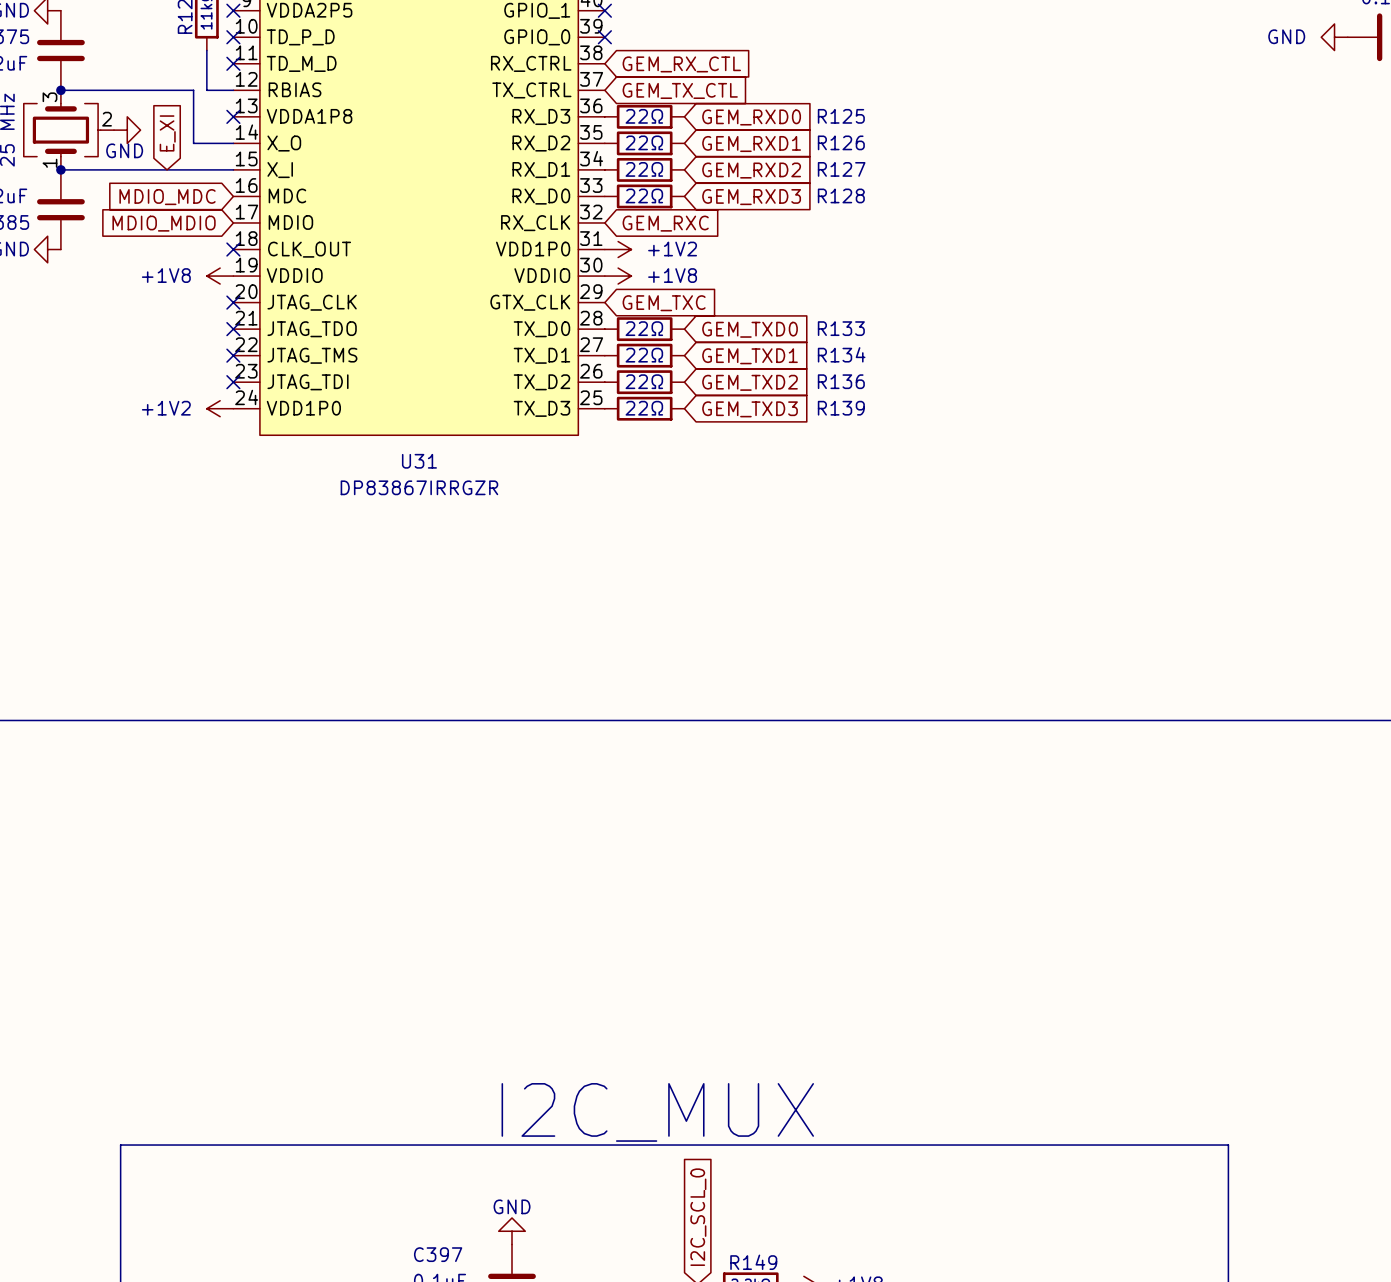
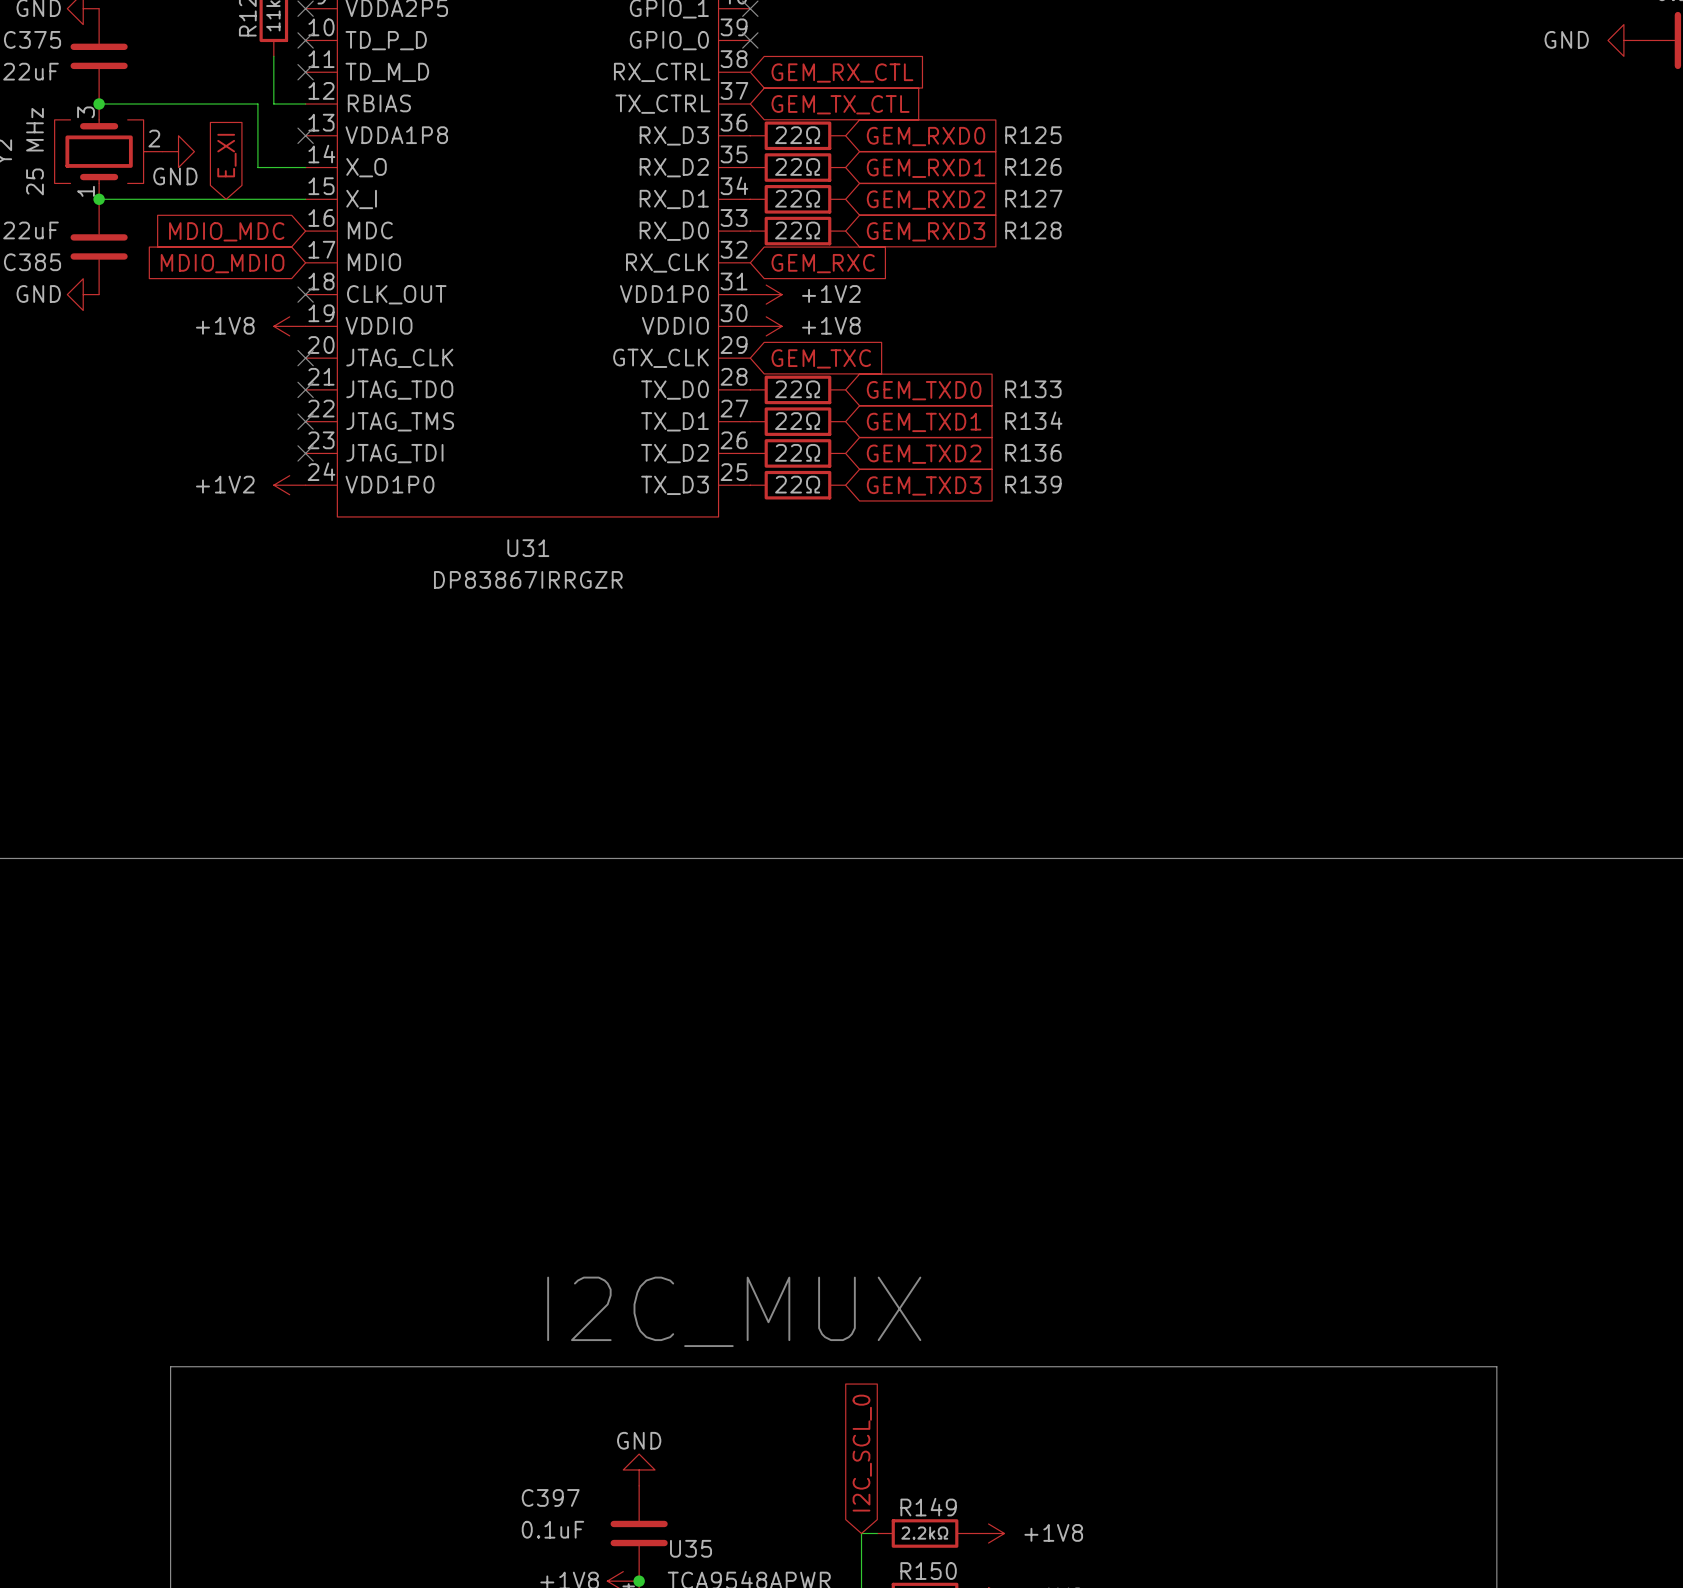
text position: I2C_MUX (657, 1112) -> I2C_MUX (734, 1311)

